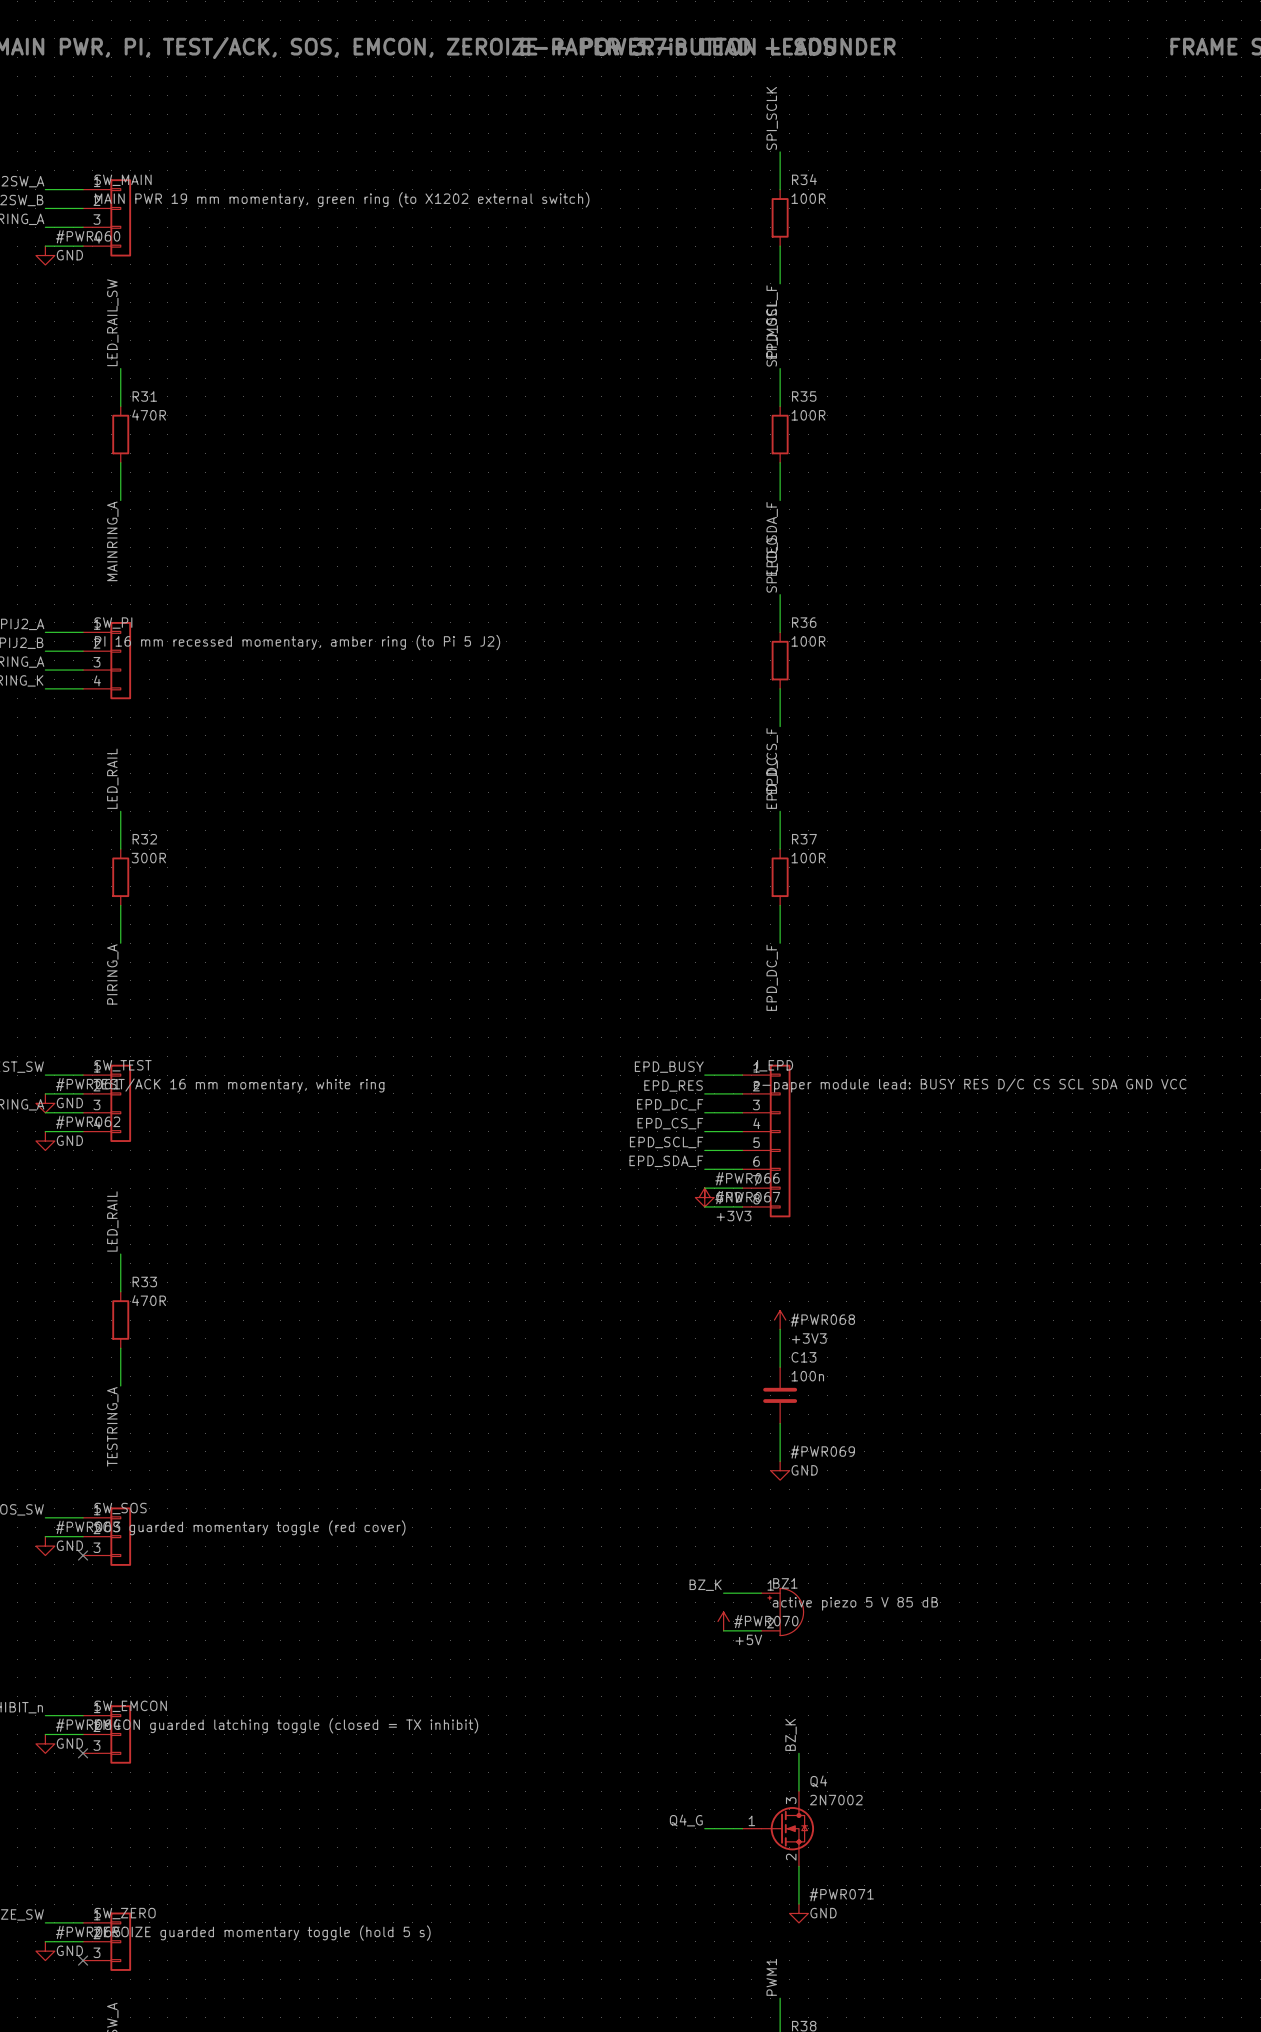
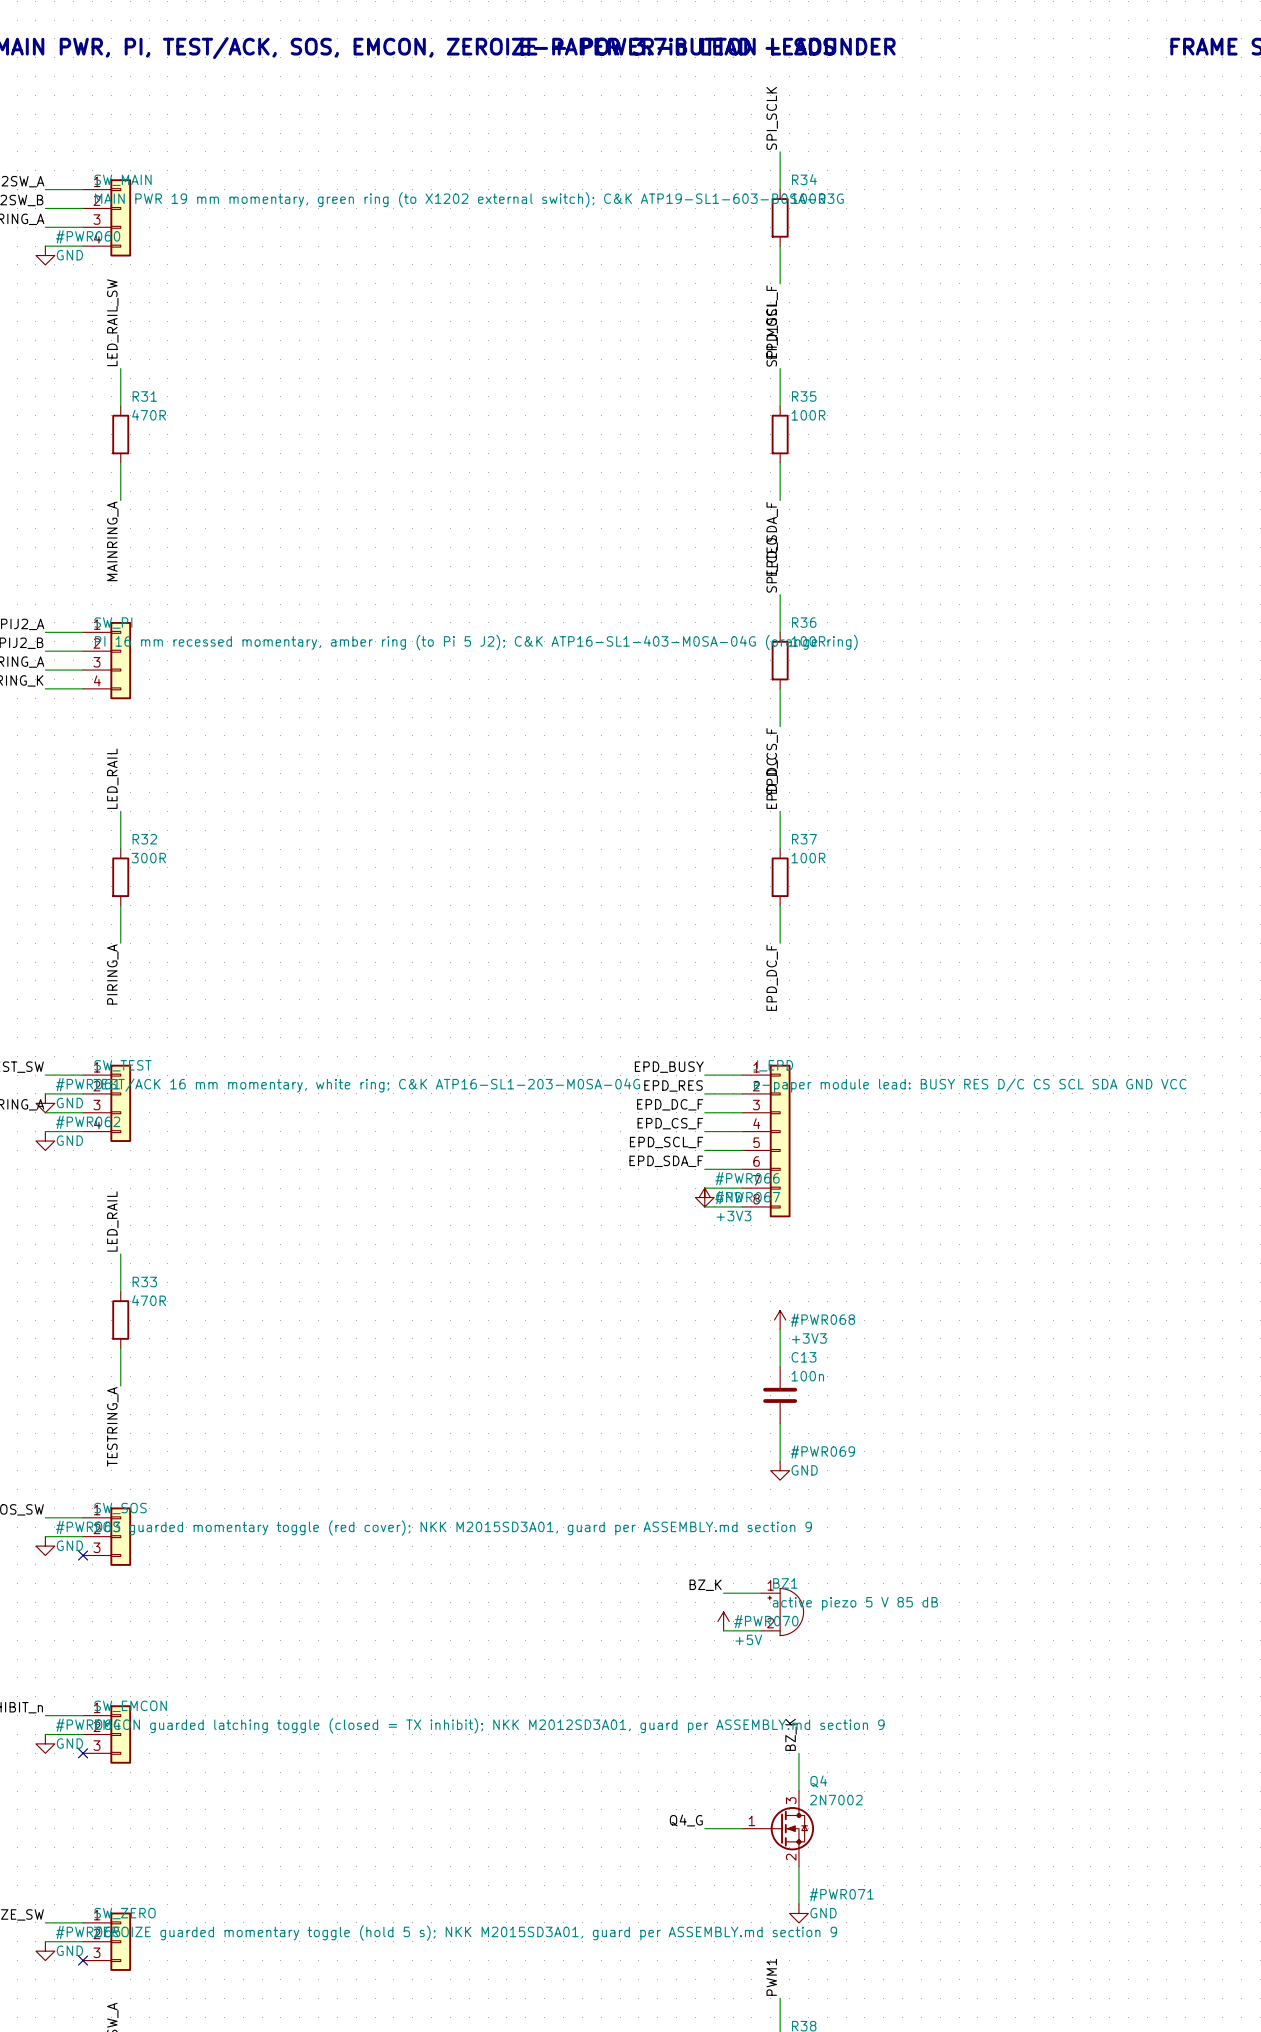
SW_MAIN value: MAIN PWR 19 mm momentary, green ring (to X1202 external switch) (342, 199) -> MAIN PWR 19 mm momentary, green ring (to X1202 external switch); C&K ATP19-SL1-603-B0SA-03G (469, 199)
SW_PI value: PI 16 mm recessed momentary, amber ring (to Pi 5 J2) (297, 642) -> PI 16 mm recessed momentary, amber ring (to Pi 5 J2); C&K ATP16-SL1-403-M0SA-04G (orange ring) (476, 642)
SW_TEST value: TEST/ACK 16 mm momentary, white ring (239, 1085) -> TEST/ACK 16 mm momentary, white ring; C&K ATP16-SL1-203-M0SA-04G (366, 1085)
SW_SOS value: SOS guarded momentary toggle (red cover) (250, 1528) -> SOS guarded momentary toggle (red cover); NKK M2015SD3A01, guard per ASSEMBLY.md section 9 (453, 1528)
SW_EMCON value: EMCON guarded latching toggle (closed = TX inhibit) (286, 1725) -> EMCON guarded latching toggle (closed = TX inhibit); NKK M2012SD3A01, guard per ASSEMBLY.md section 9 (489, 1725)
SW_ZERO value: ZEROIZE guarded momentary toggle (hold 5 s) (262, 1933) -> ZEROIZE guarded momentary toggle (hold 5 s); NKK M2015SD3A01, guard per ASSEMBLY.md section 9 (465, 1933)

